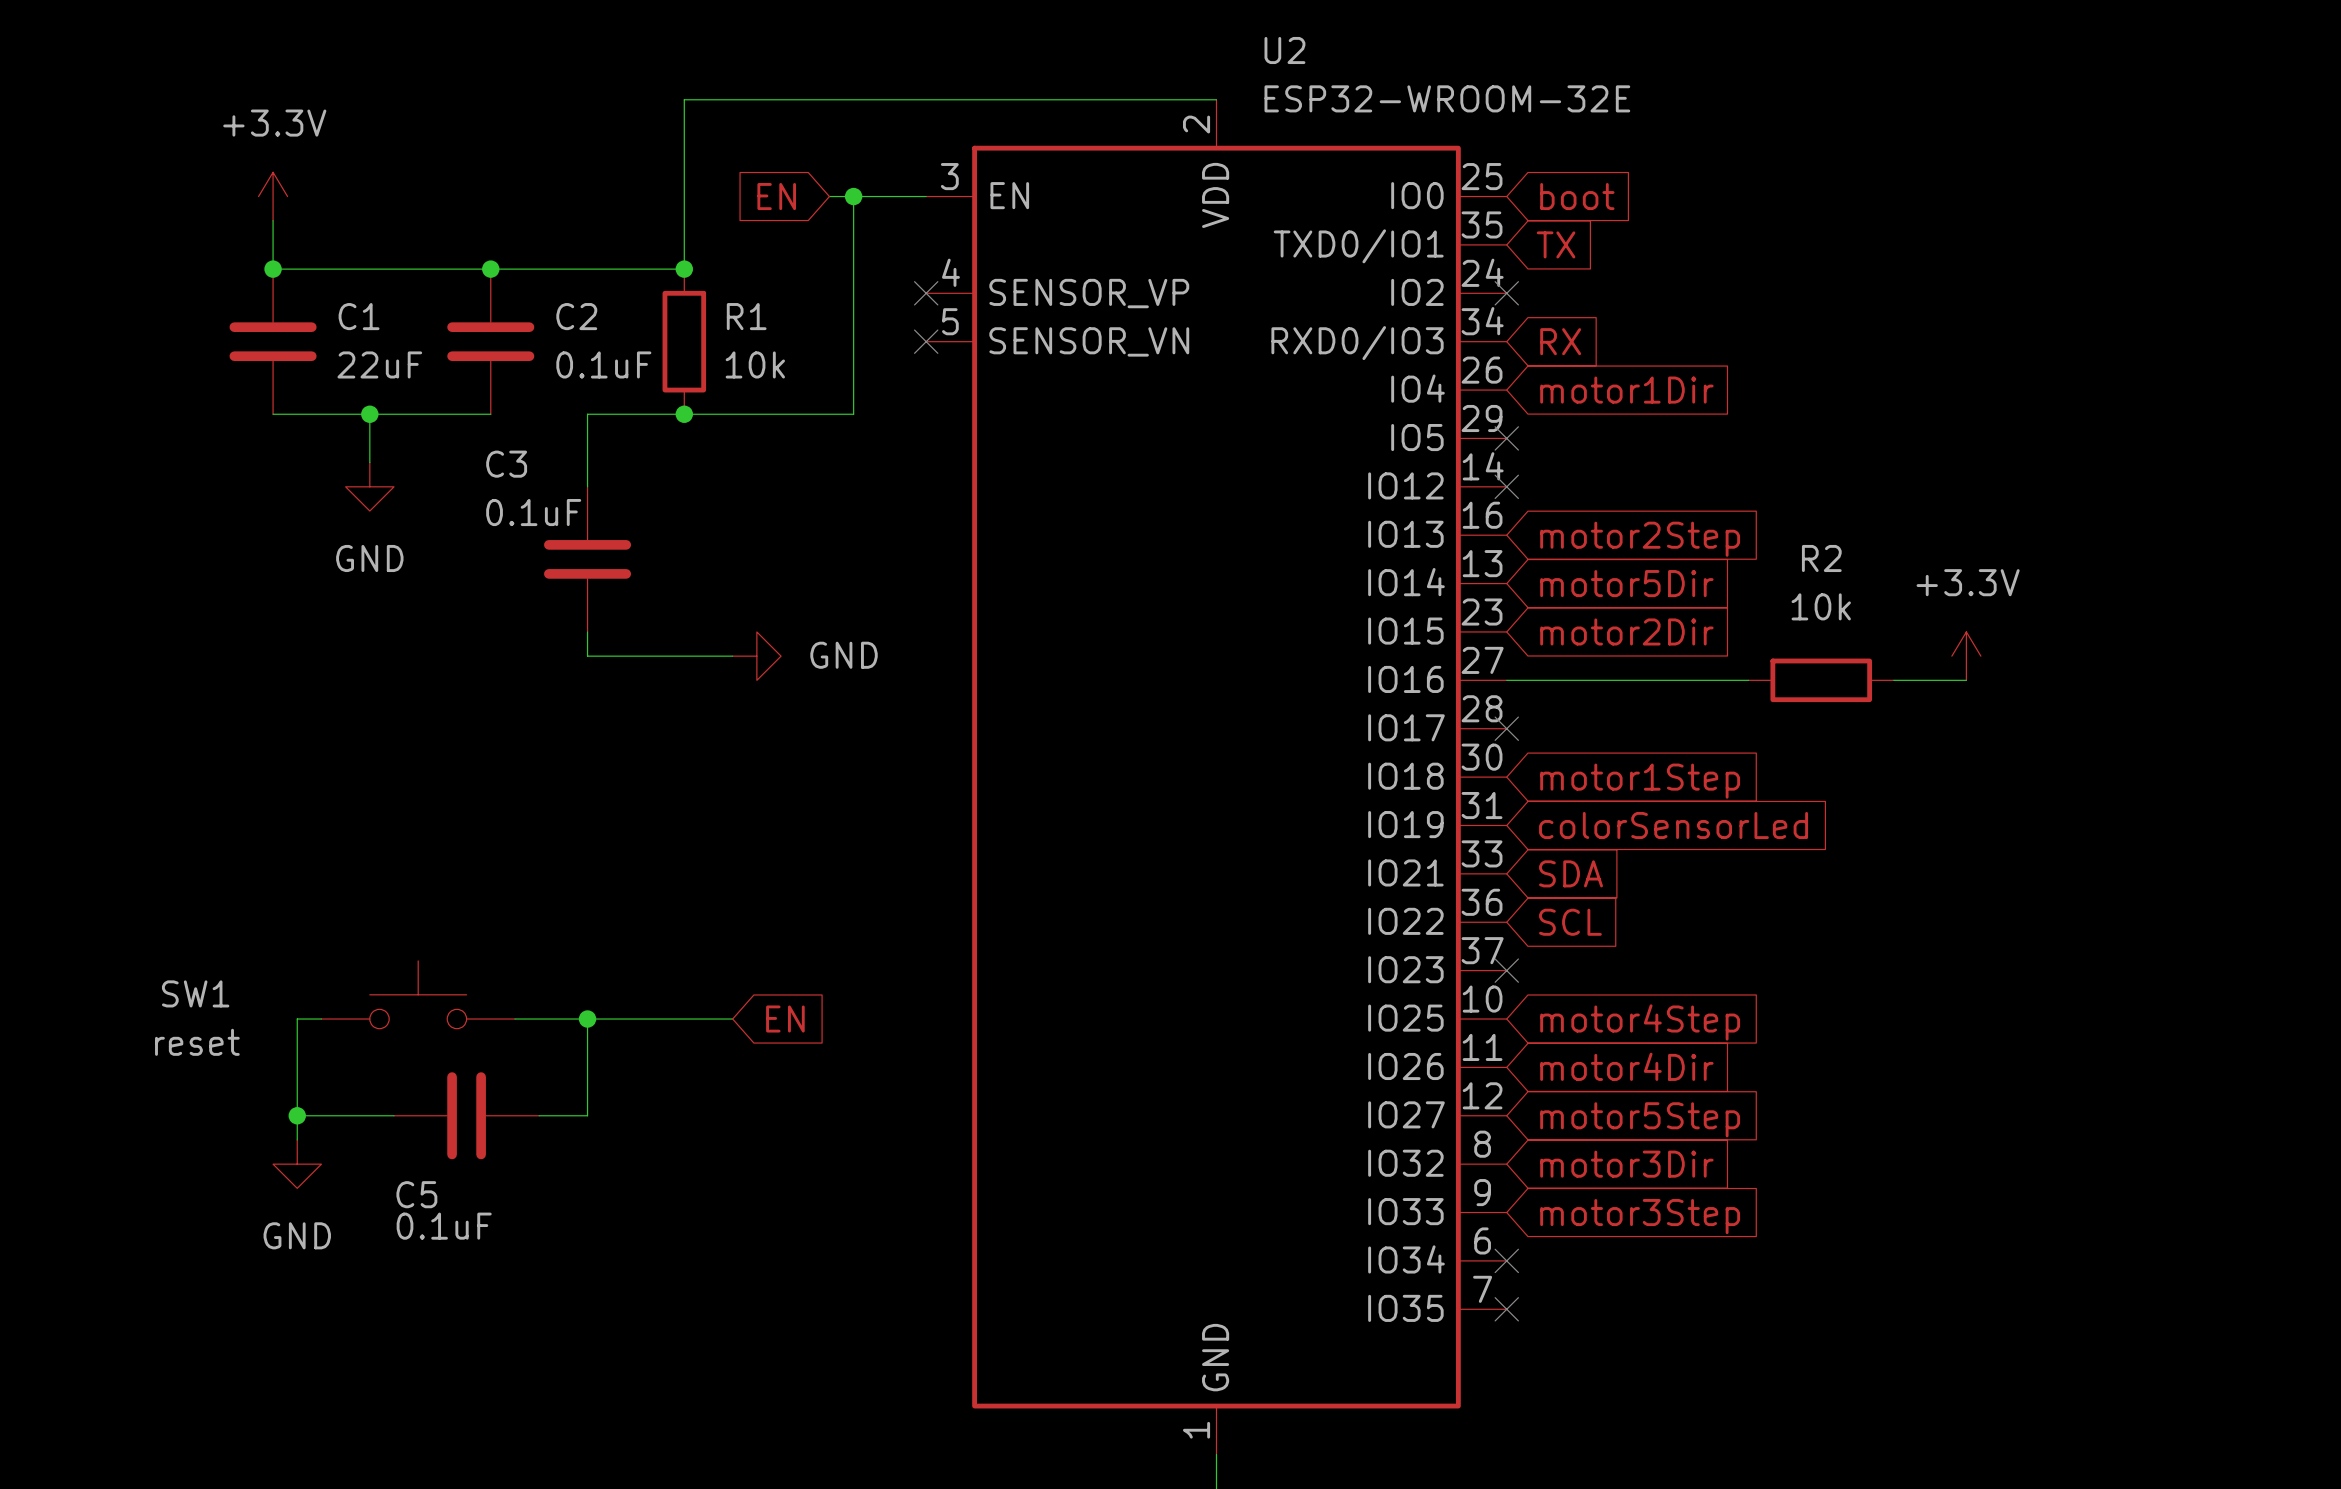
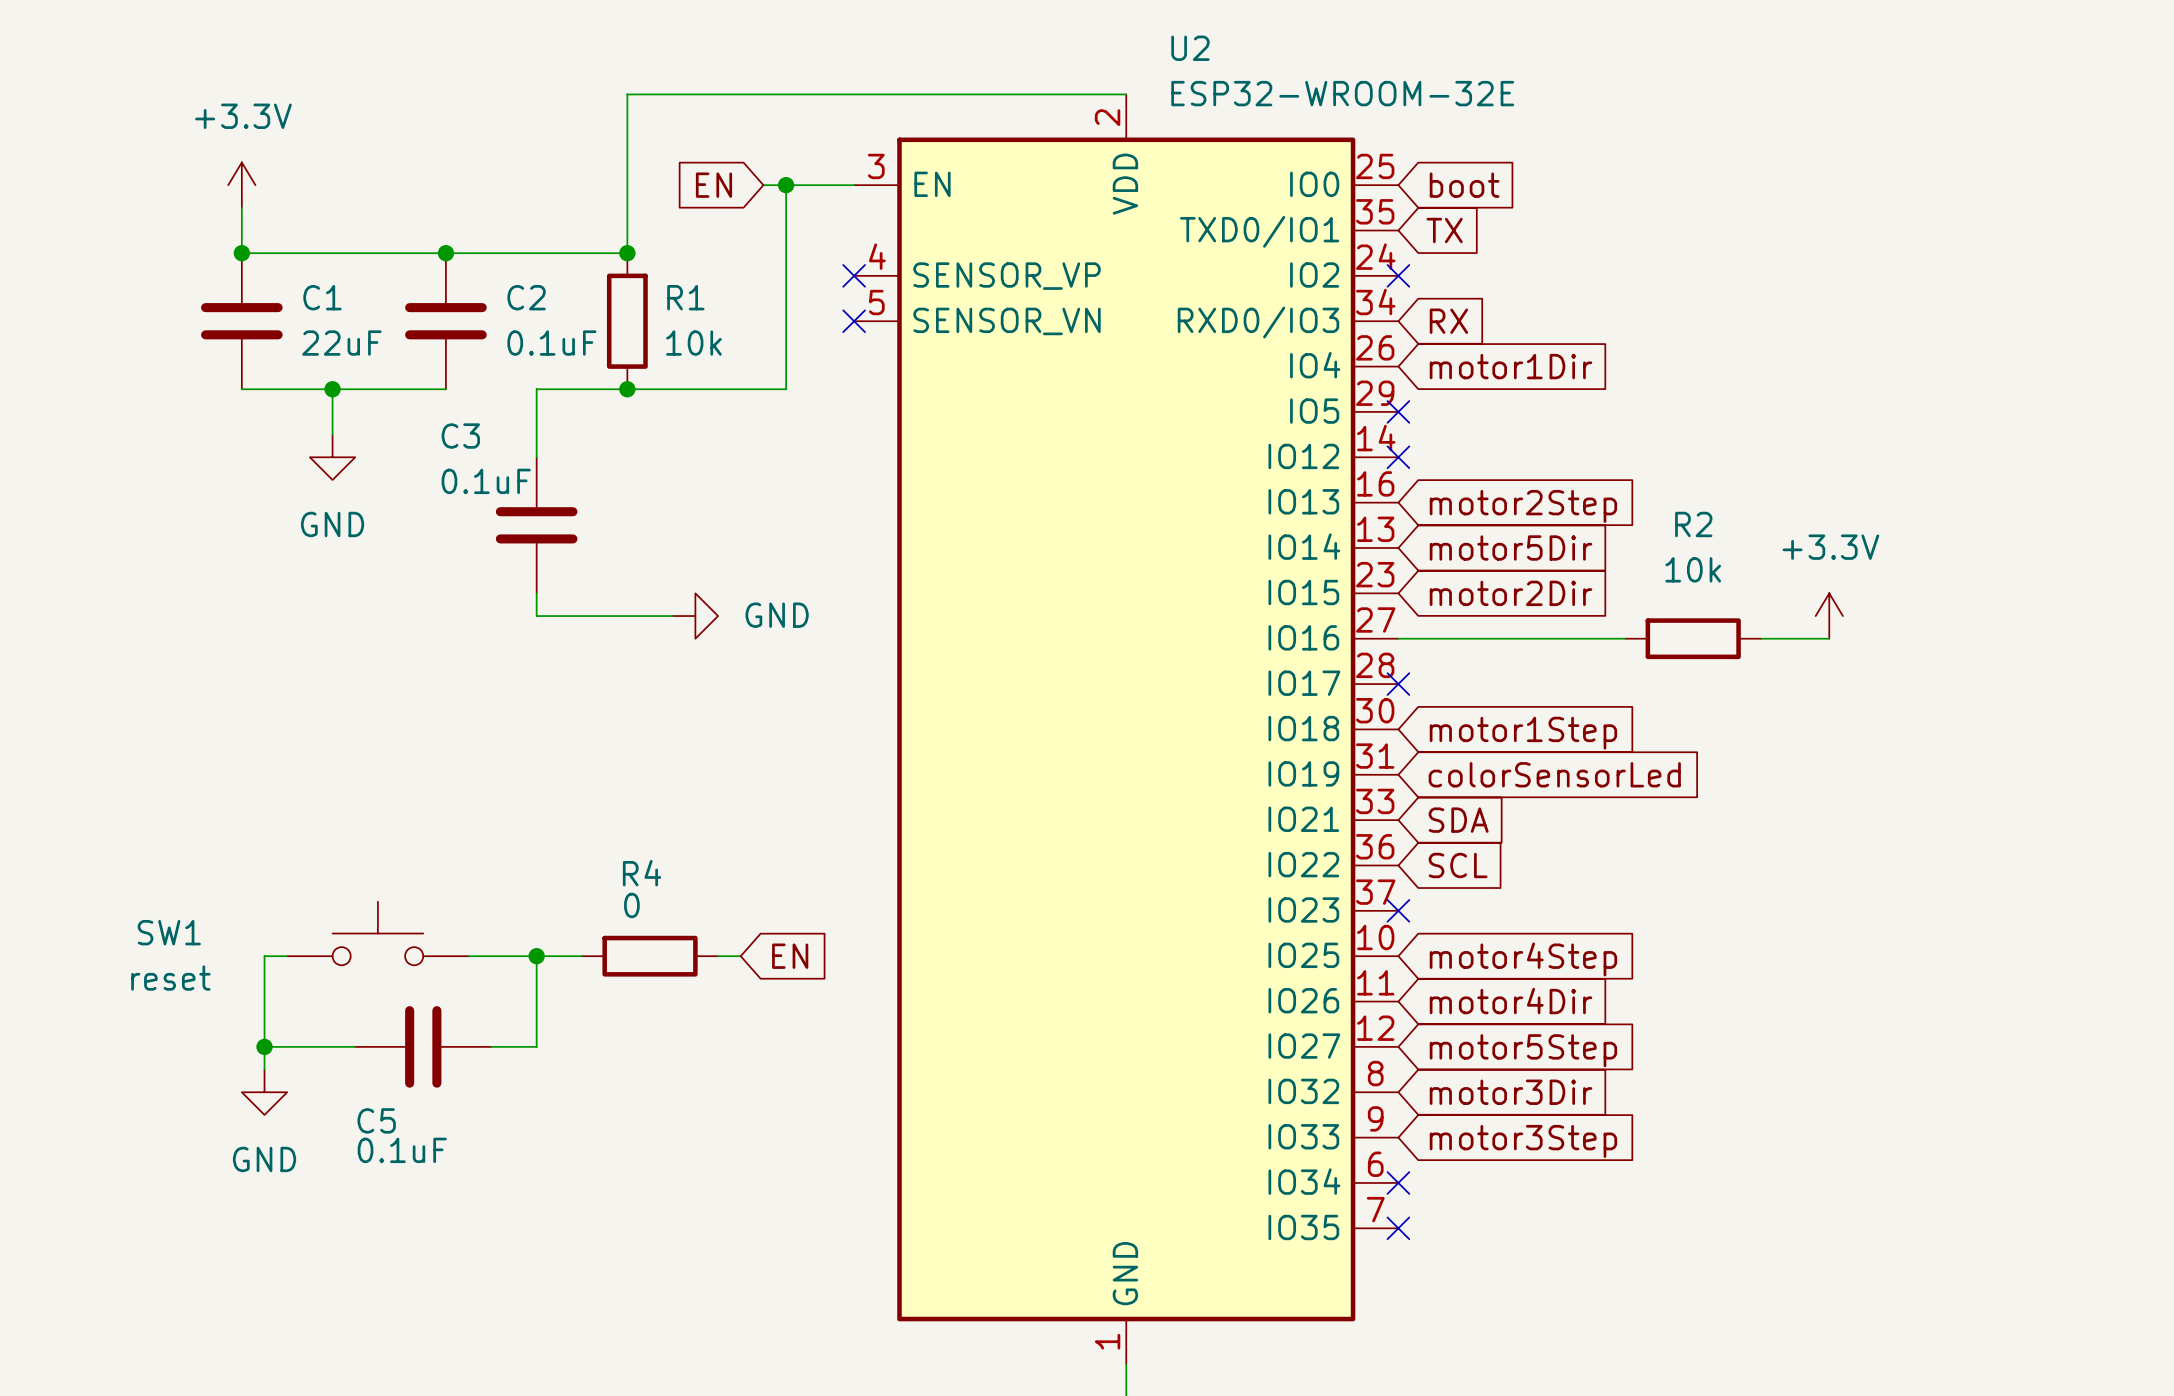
wire: (635, 1019) (732, 1019) -> none
R4: none -> 0 (650, 956)
wire: none -> (718, 956) (740, 956)
global label position: EN (785, 1019) -> EN (790, 956)

